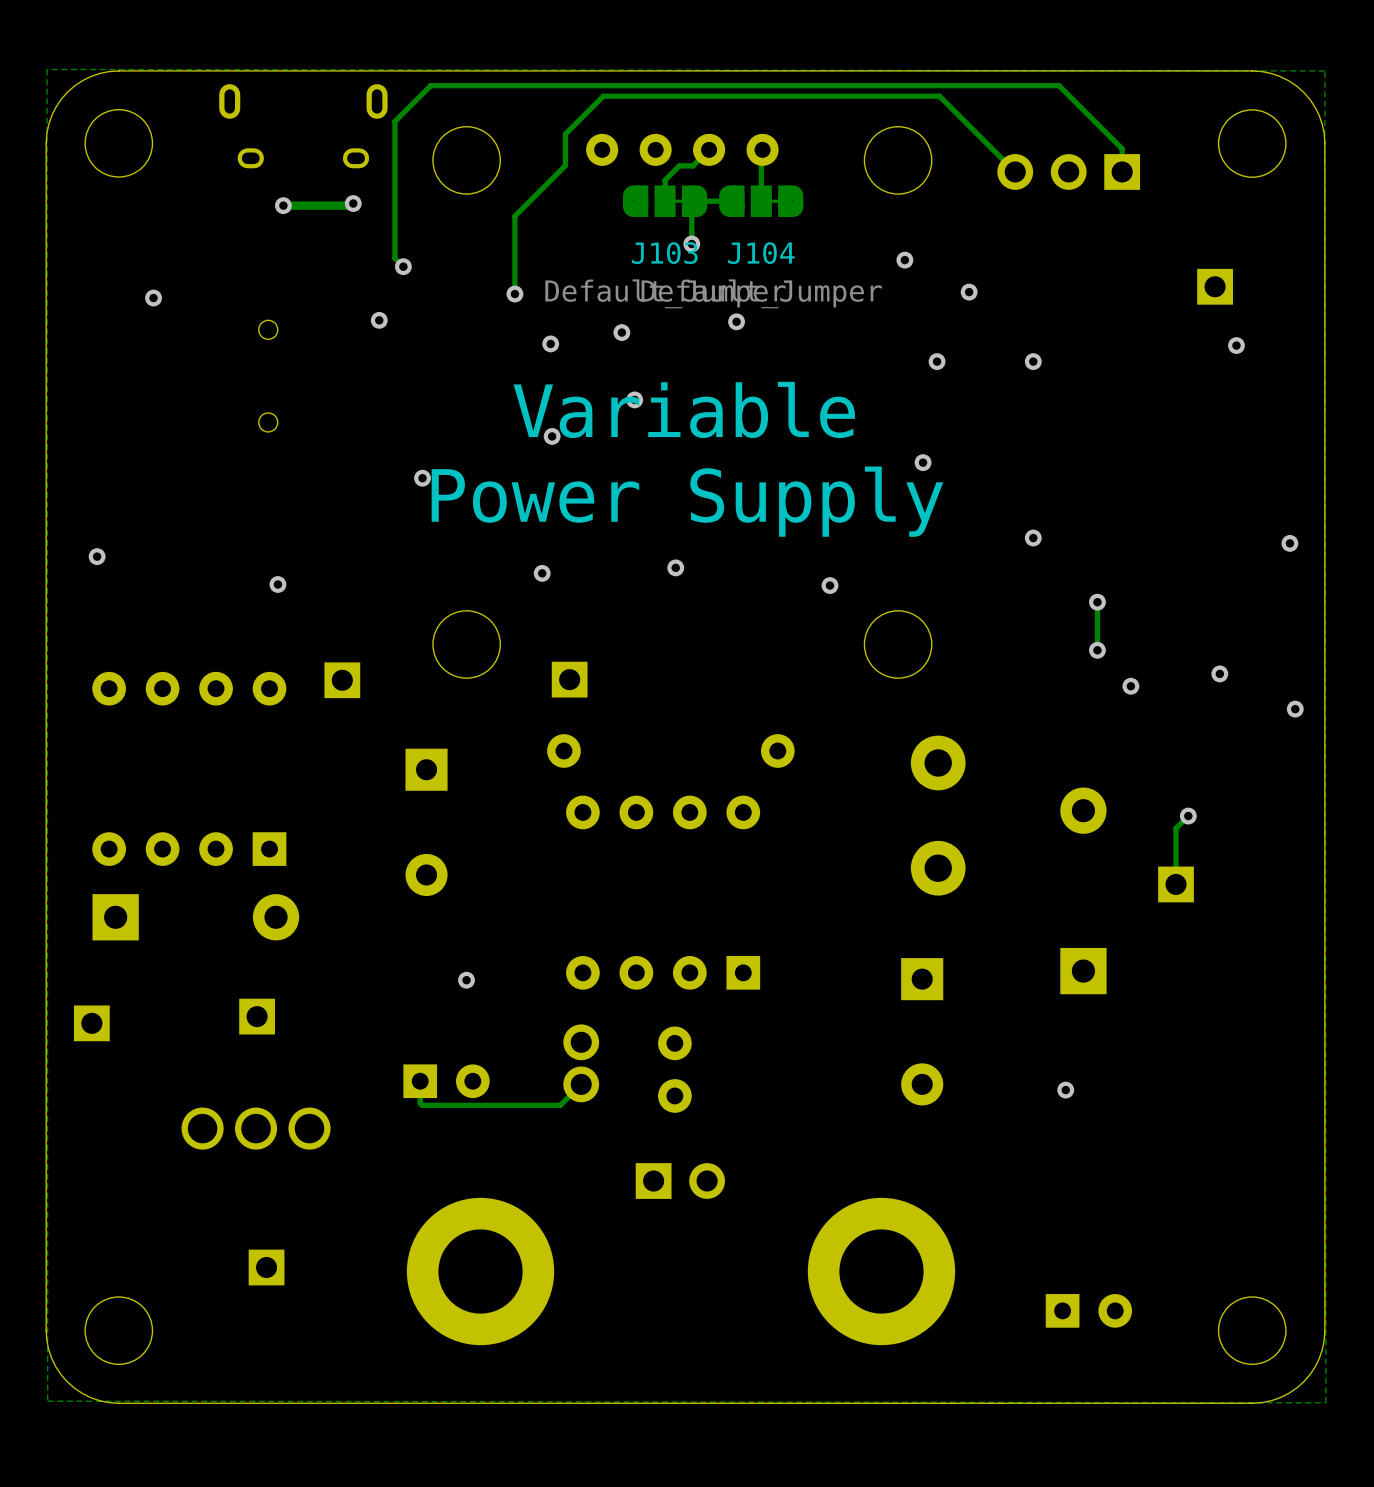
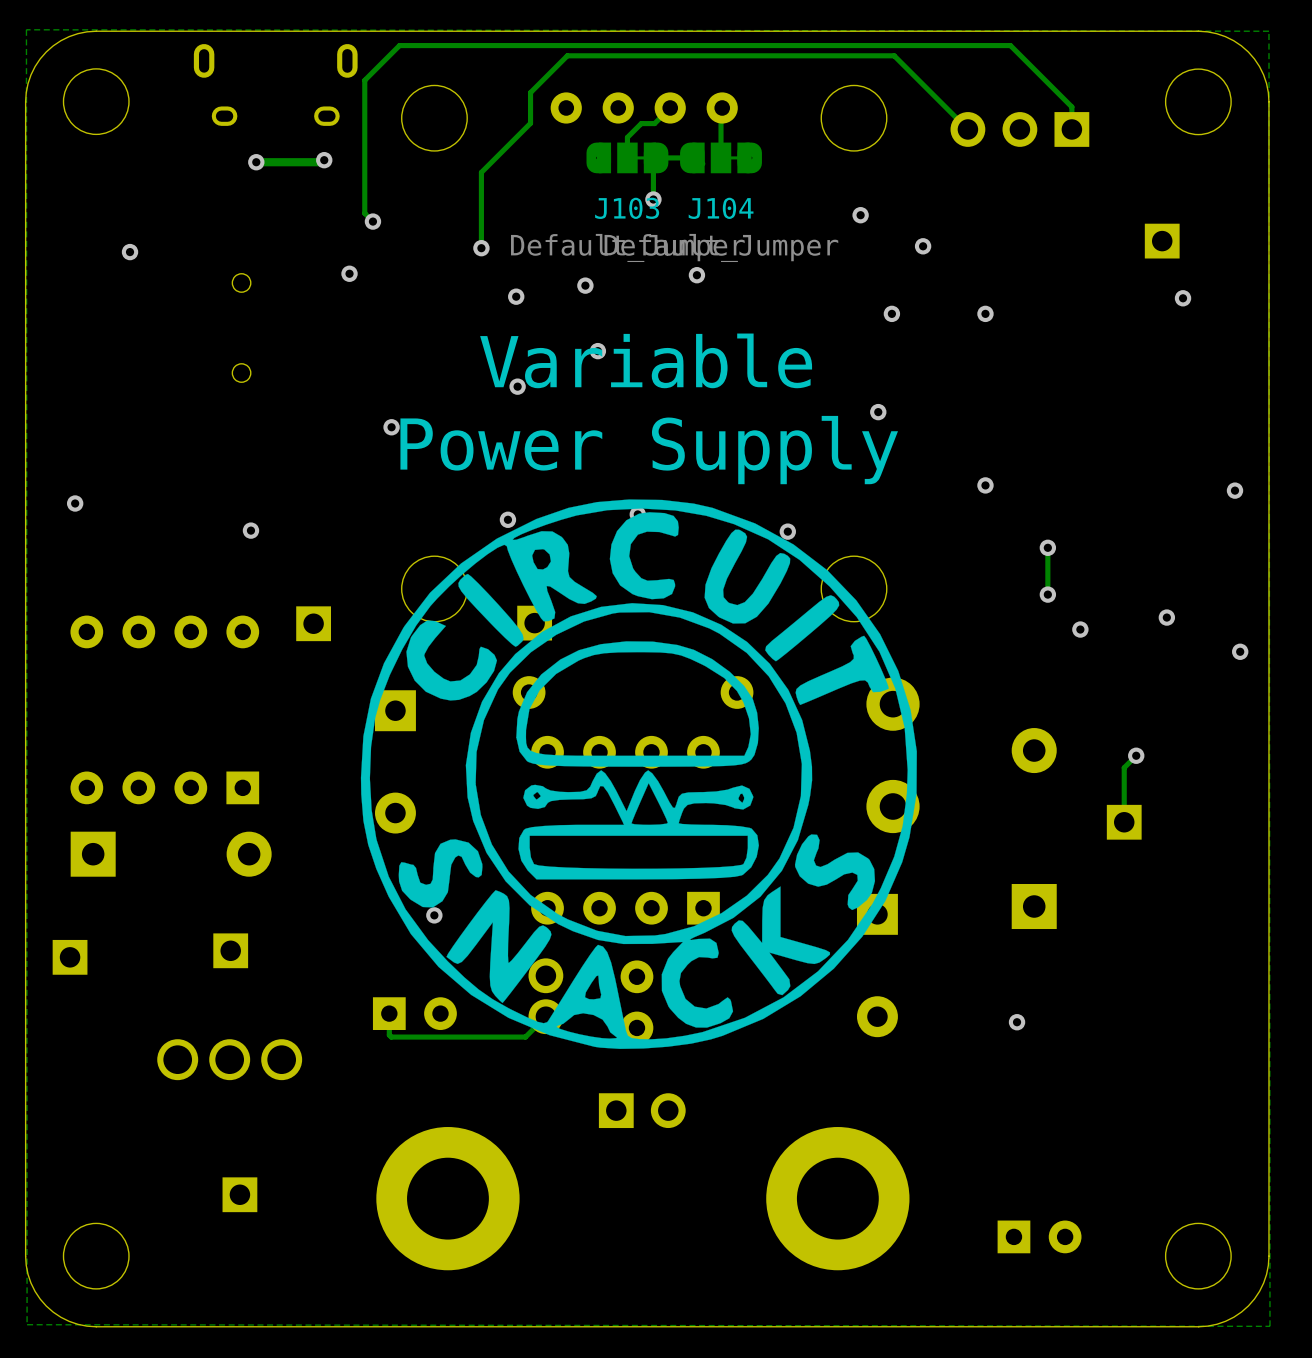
drawing: none -> [360, 499, 917, 1049]

